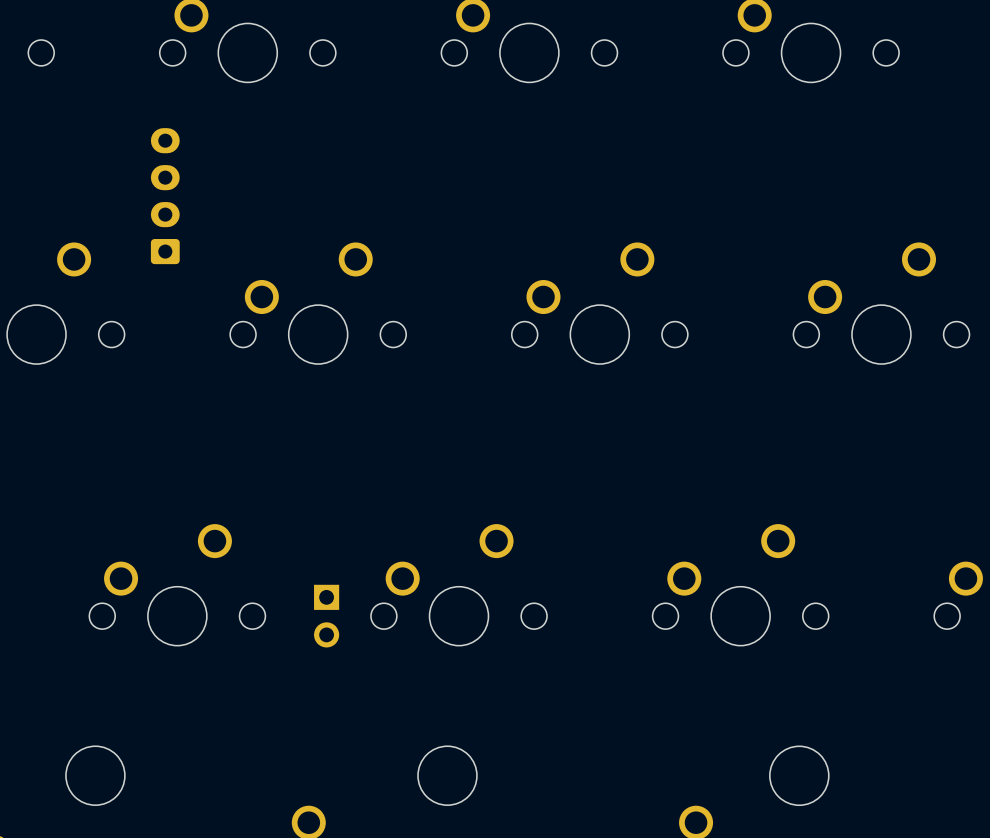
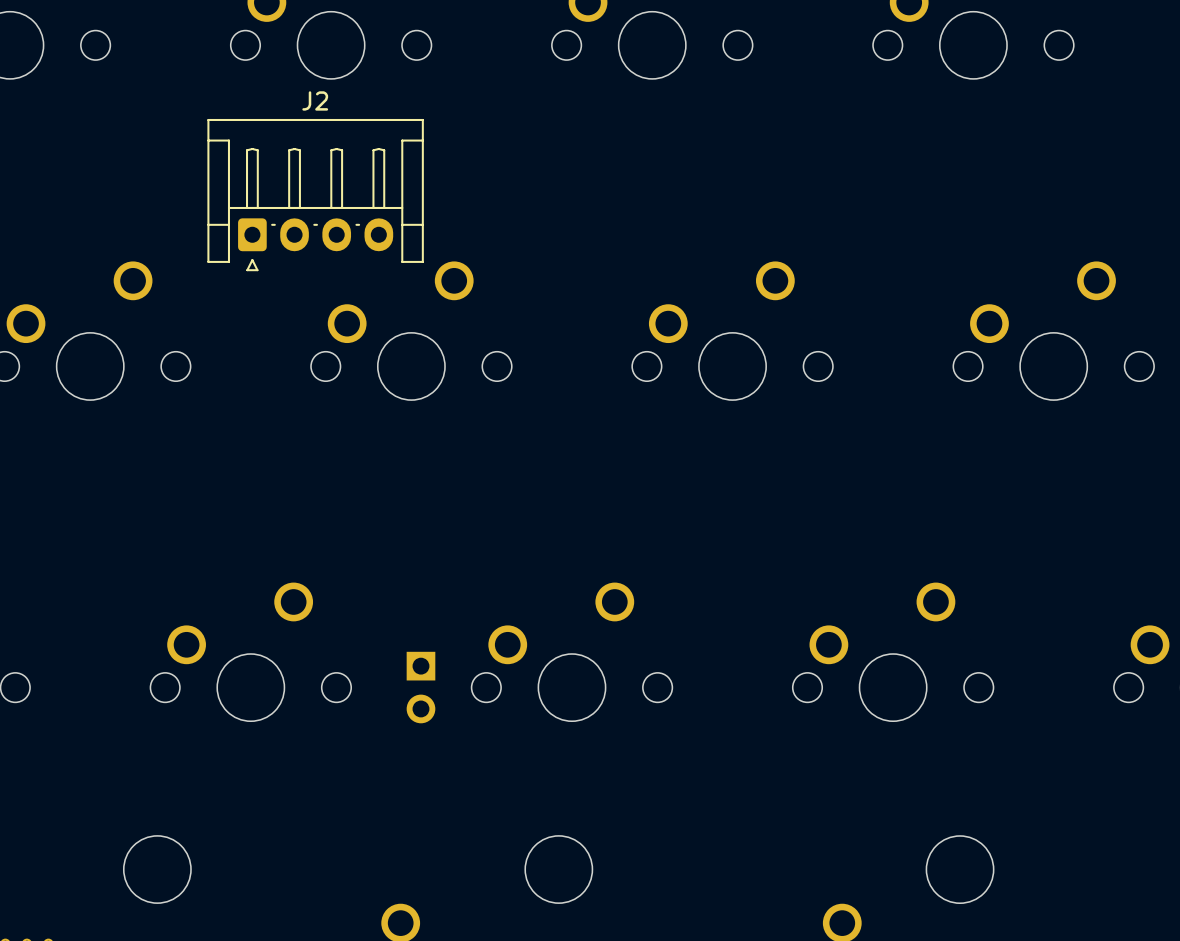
J2 side: bottom (165, 196) -> top (315, 195)

